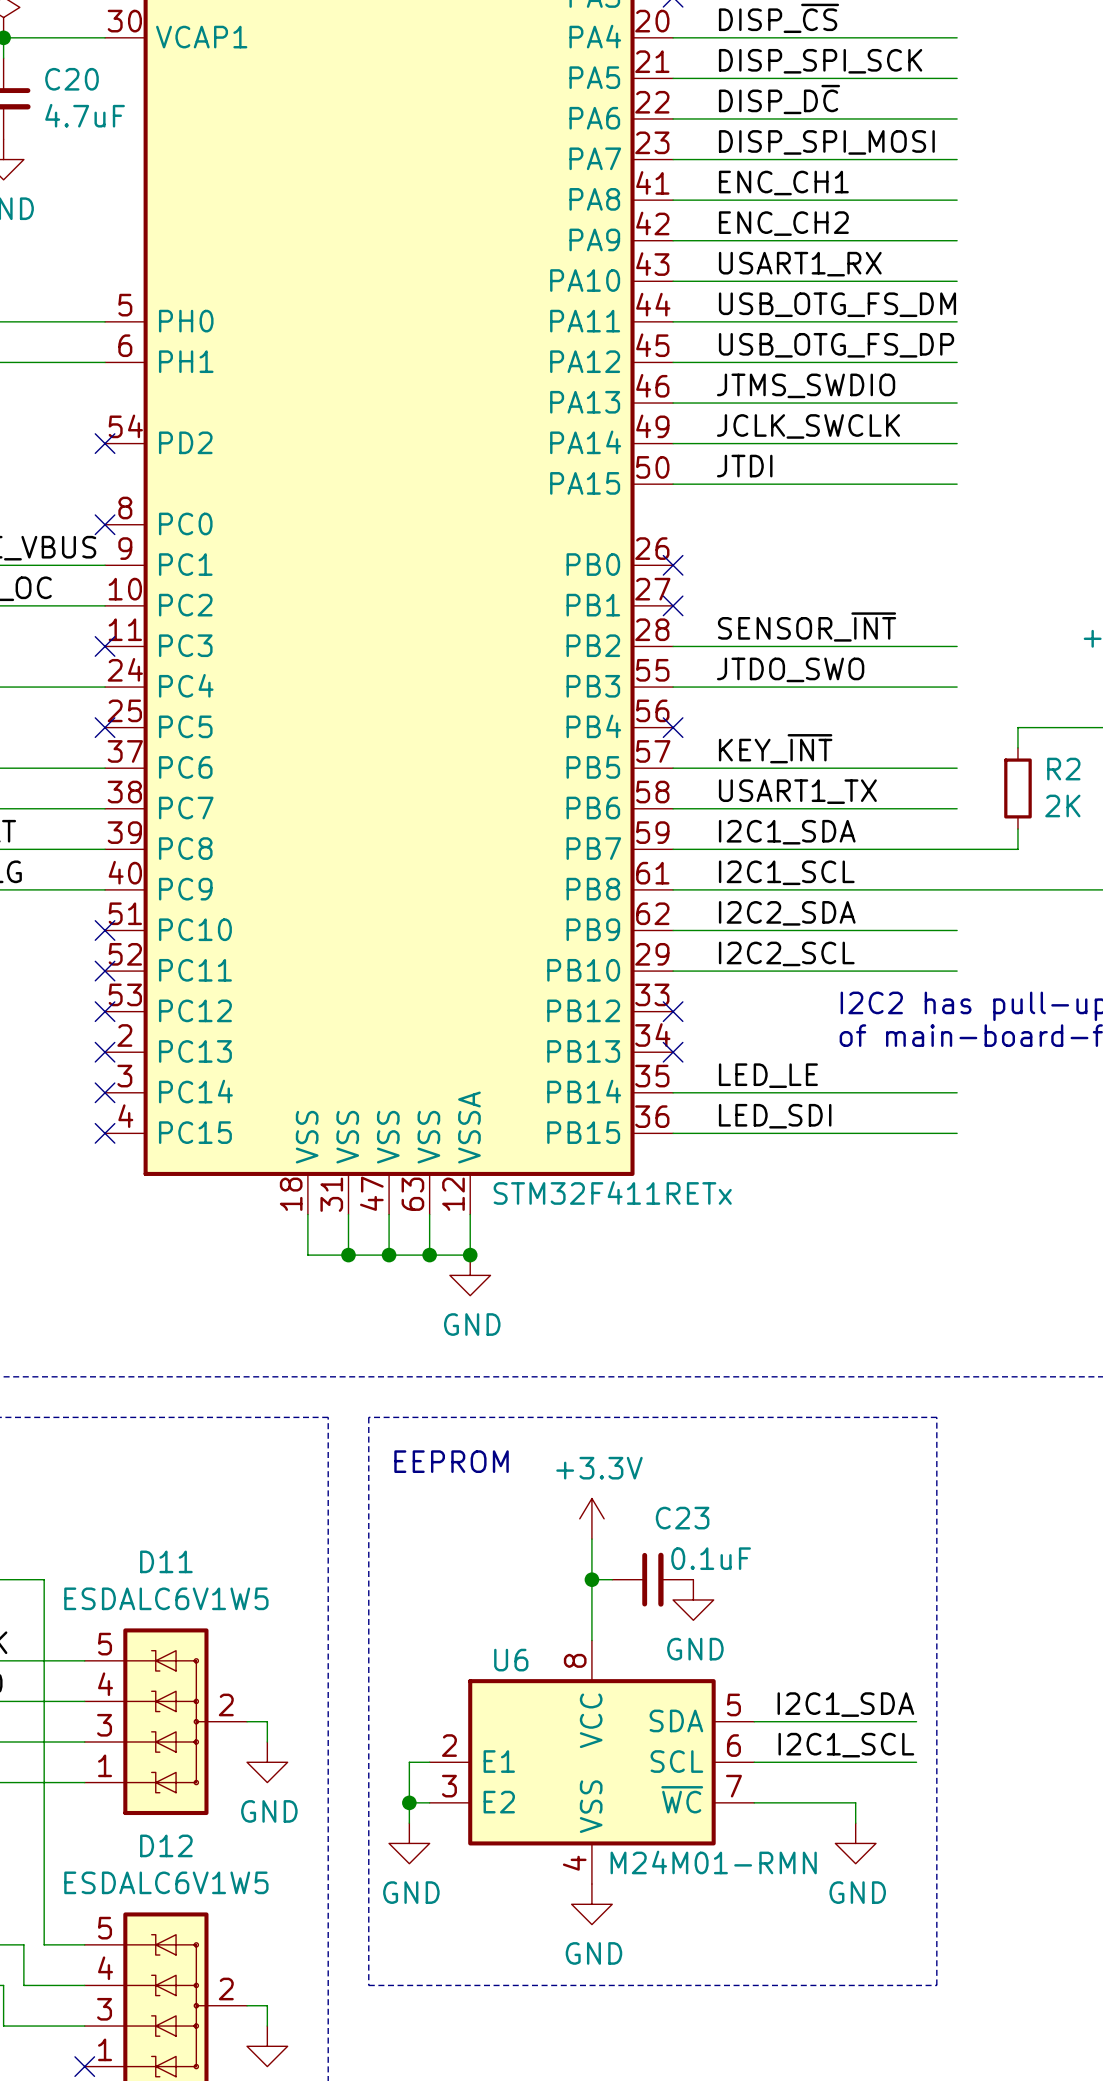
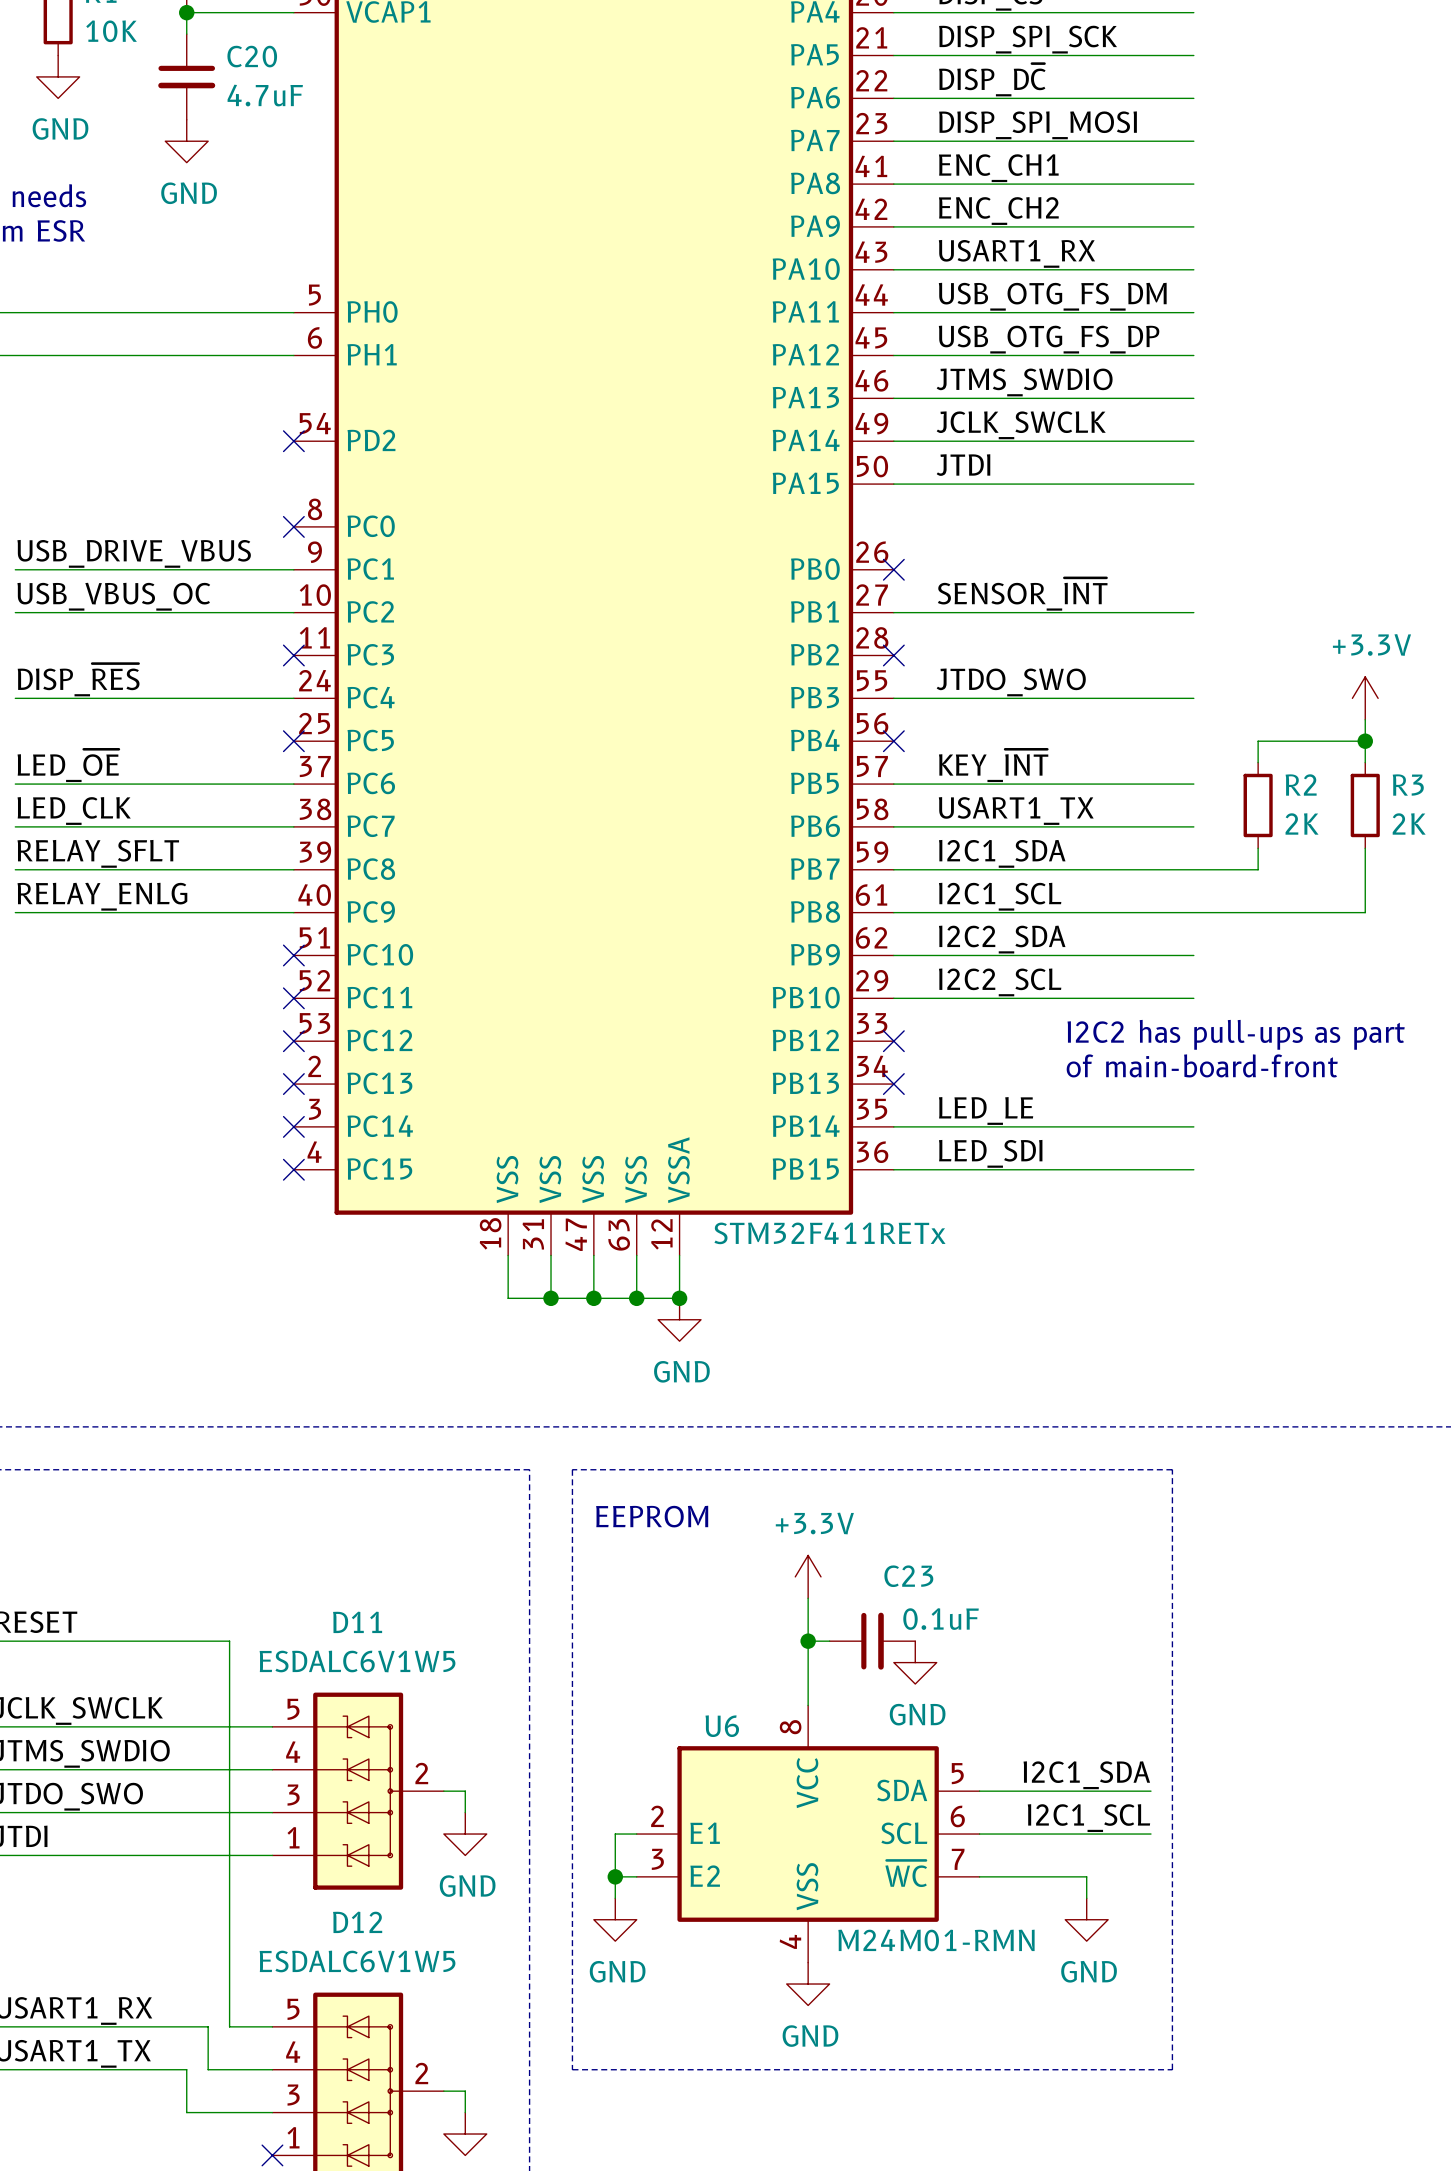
no-connect mark position: (673, 605) -> (893, 655)
label position: SENSOR_~{INT} (807, 626) -> SENSOR_~{INT} (1022, 594)
wire: (673, 646) (957, 646) -> (893, 612) (1193, 612)

